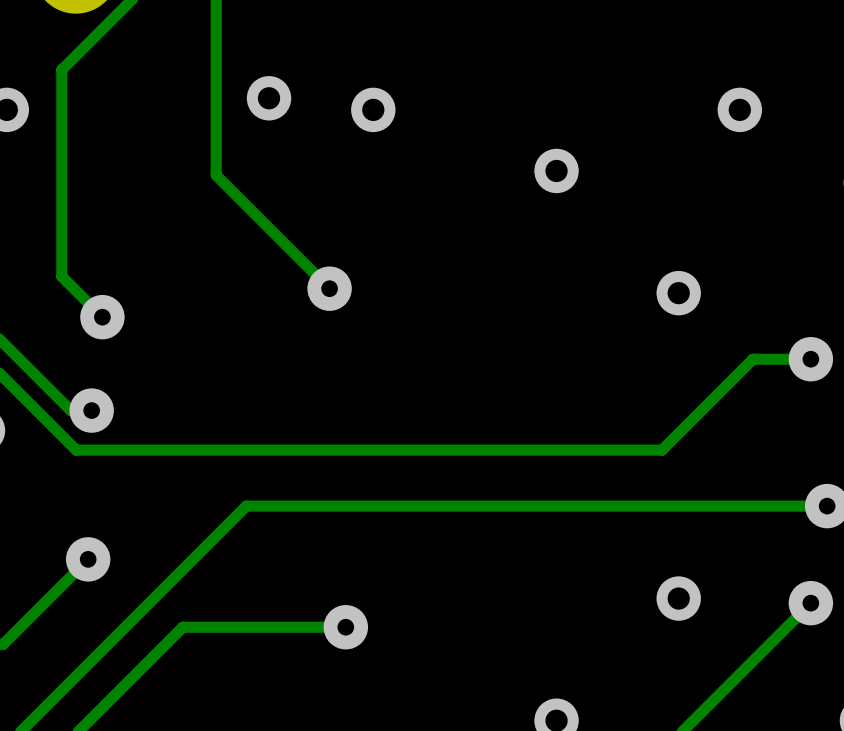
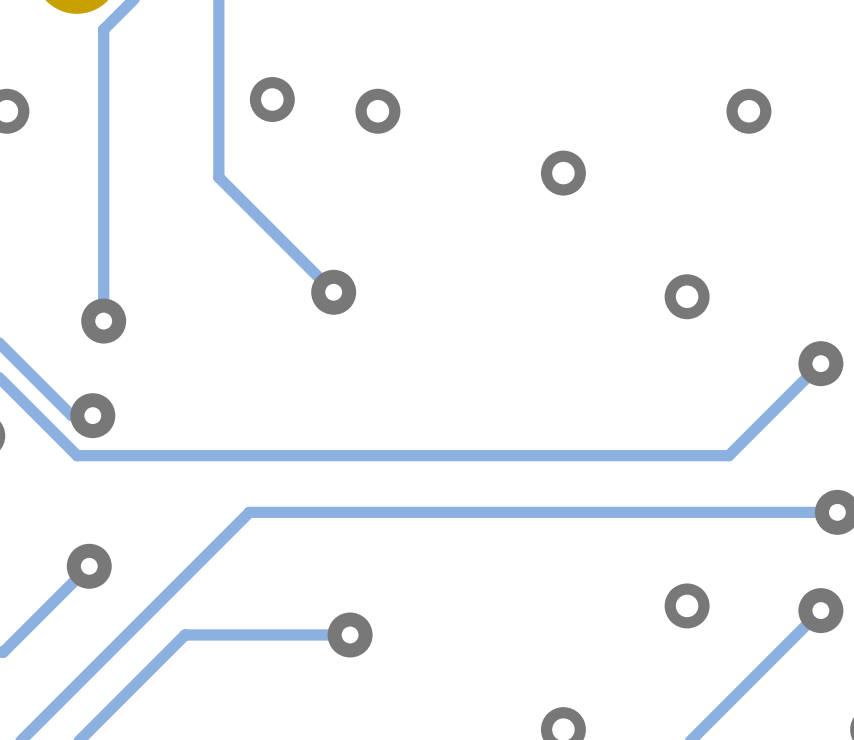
track: (102, 29) (61, 69) (61, 276) (102, 317) -> (103, 29) (103, 321)
track: (810, 359) (752, 359) (662, 450) -> (820, 363) (728, 455) (670, 455)

